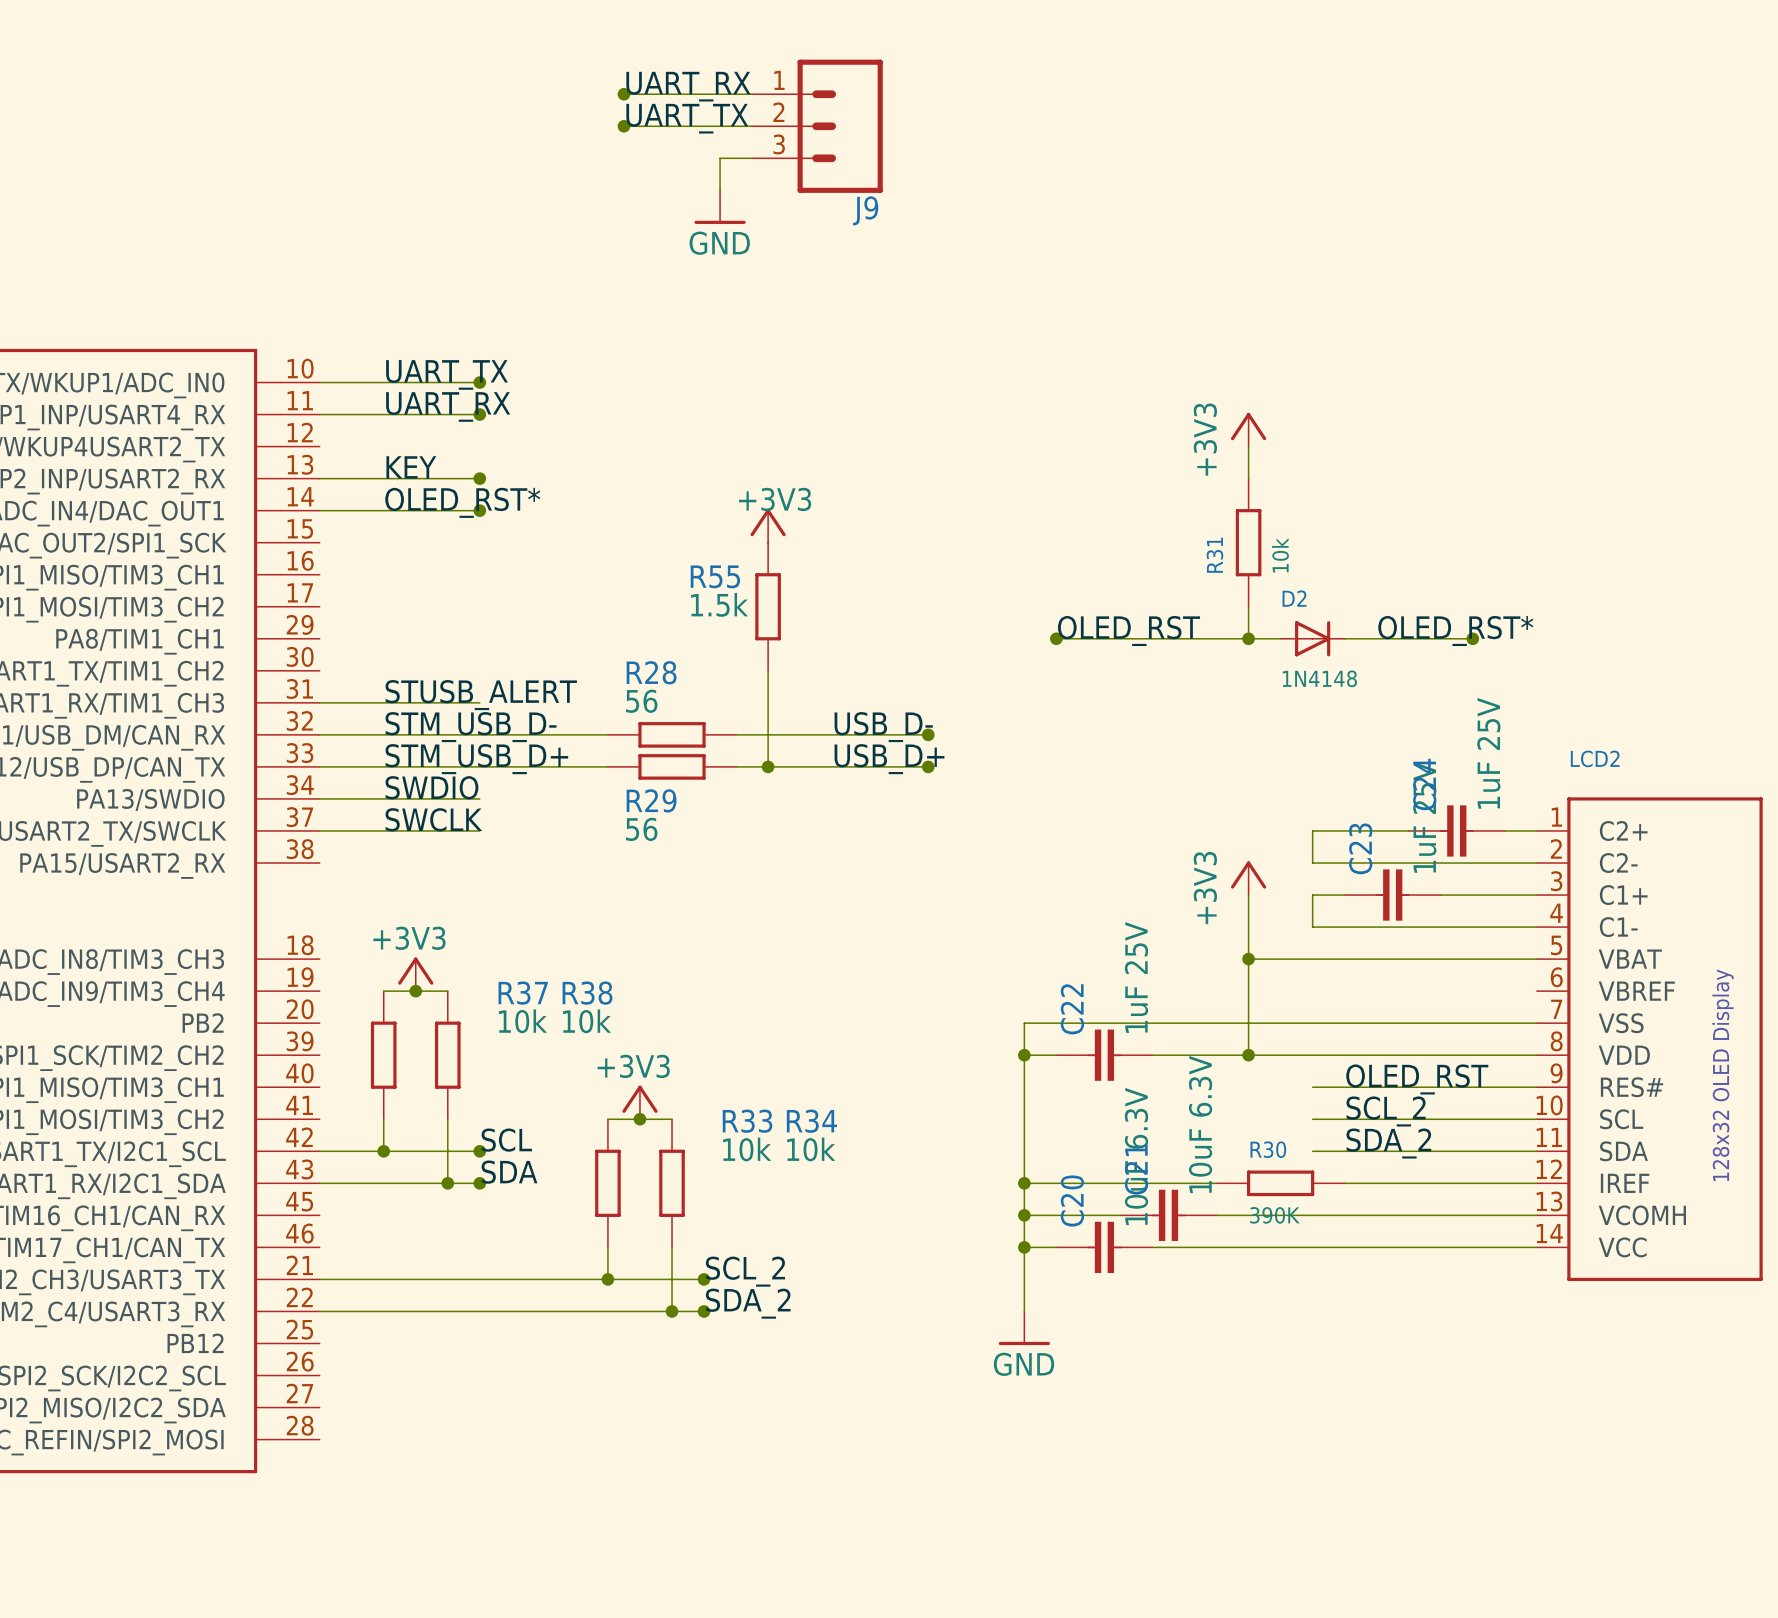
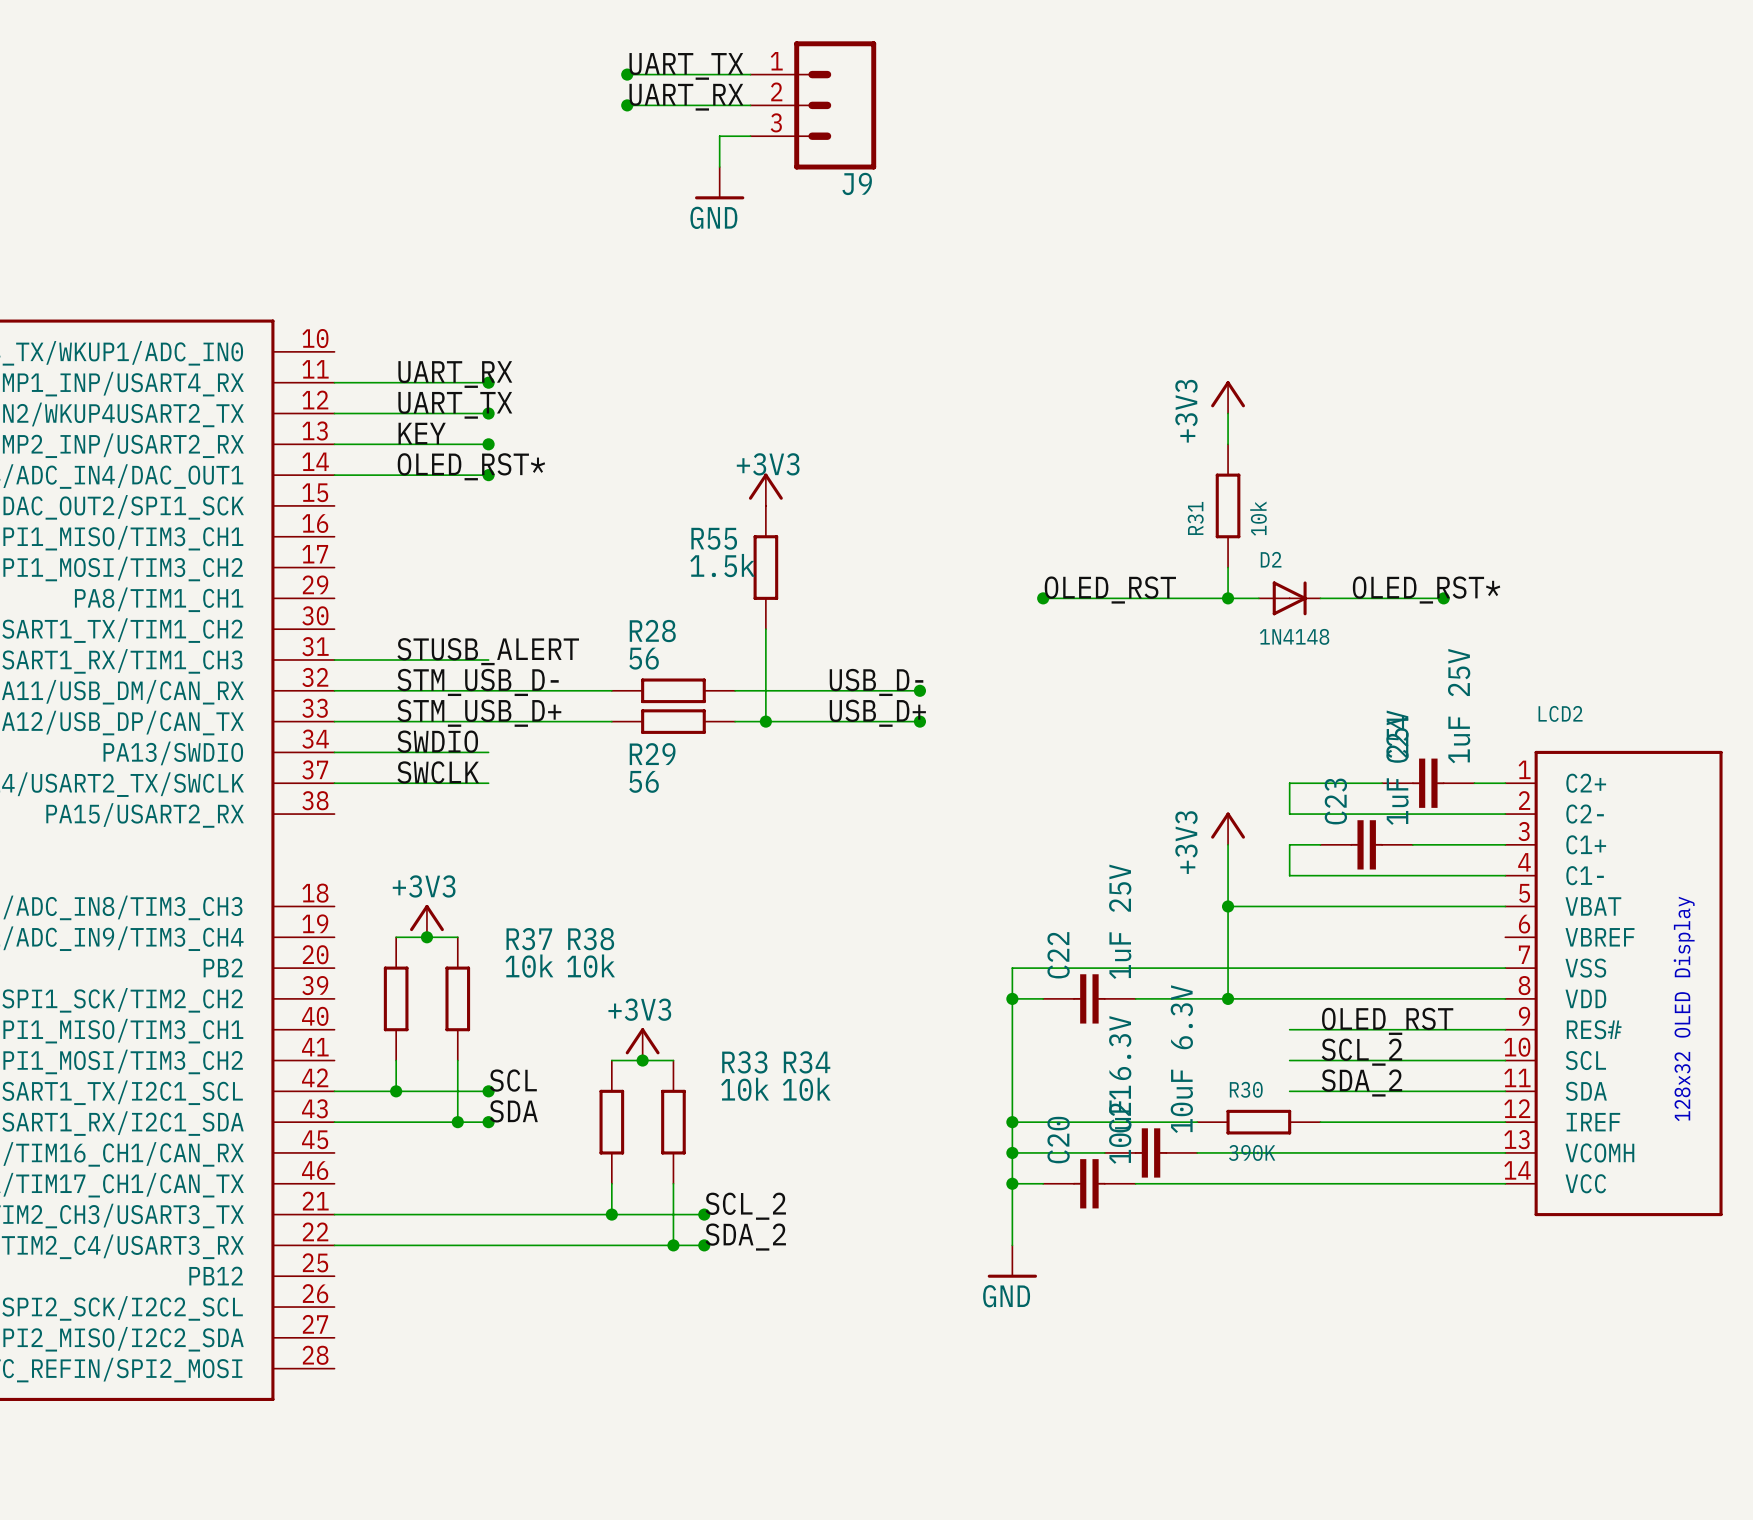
label: UART_RX (688, 86) -> UART_TX (686, 66)
label: UART_TX (687, 118) -> UART_RX (686, 97)
label position: UART_TX (447, 374) -> UART_TX (455, 405)
wire: (319, 382) (479, 382) -> (334, 413) (488, 413)
junction position: (479, 382) -> (488, 413)

